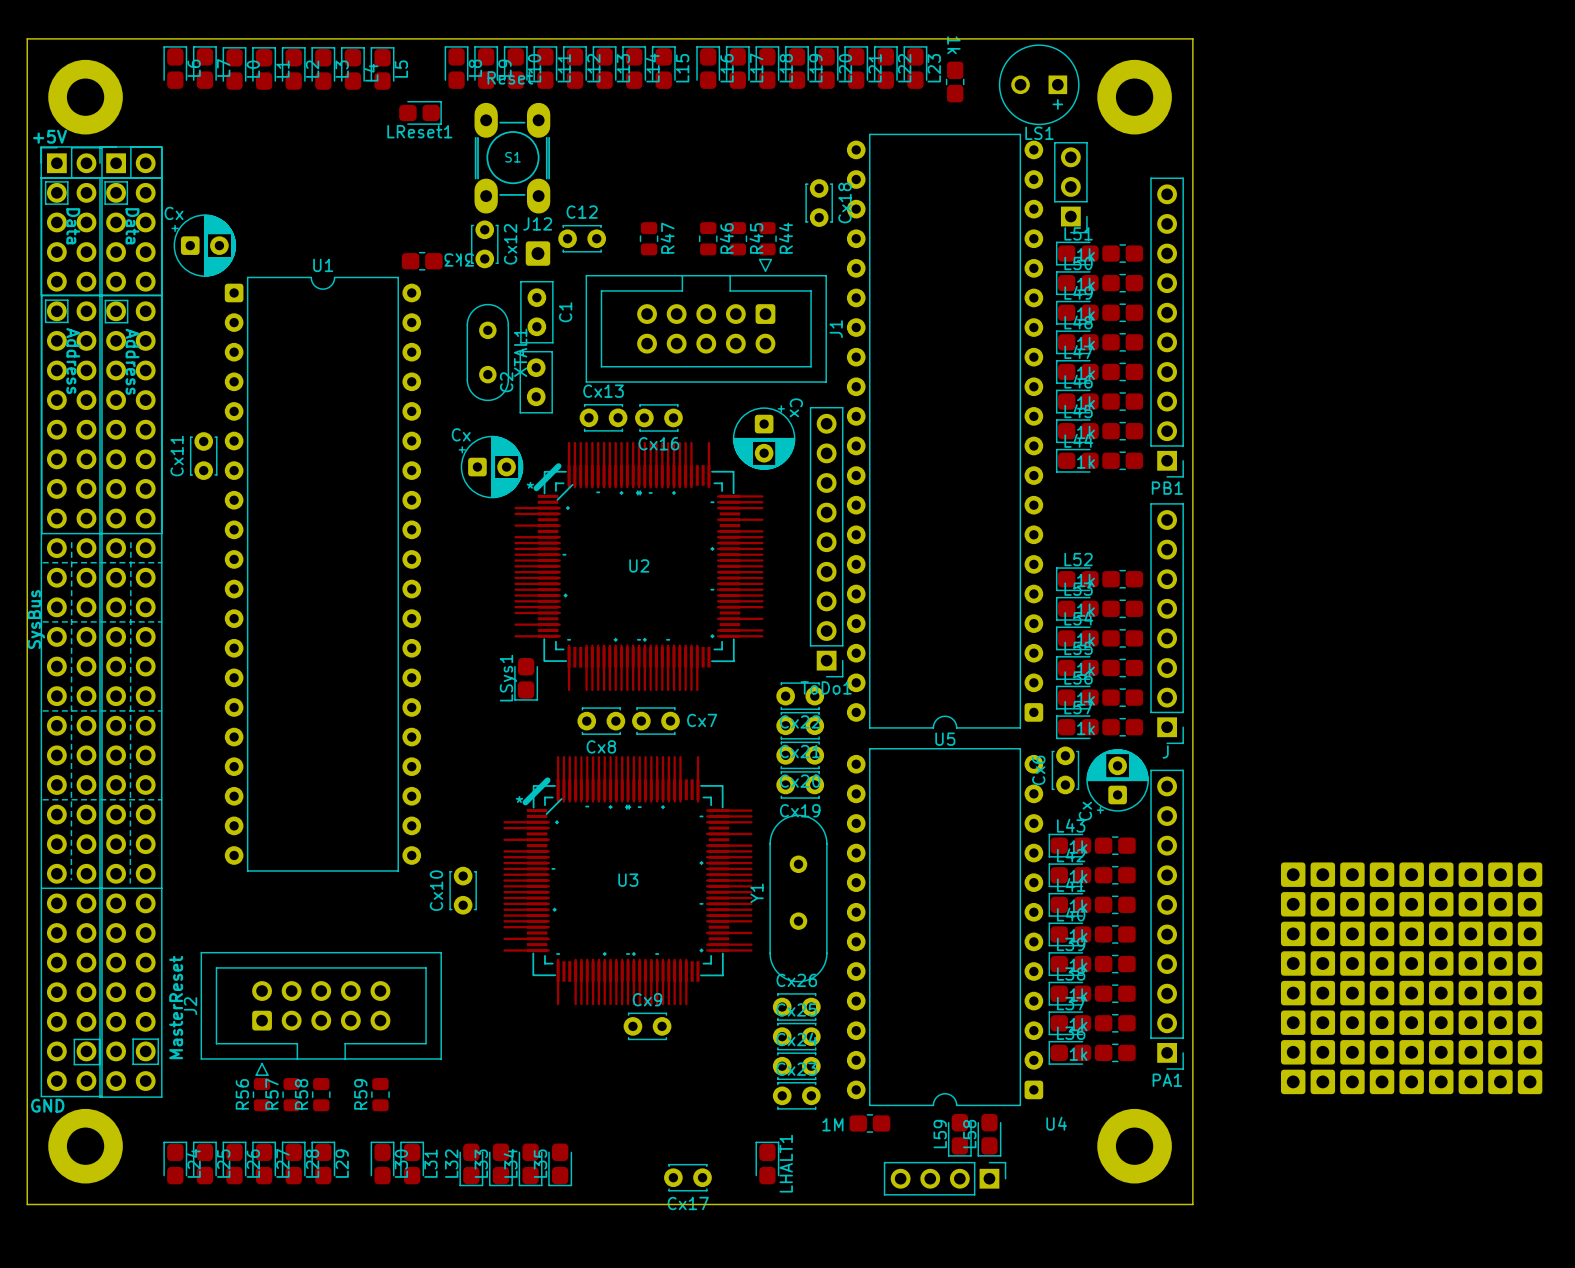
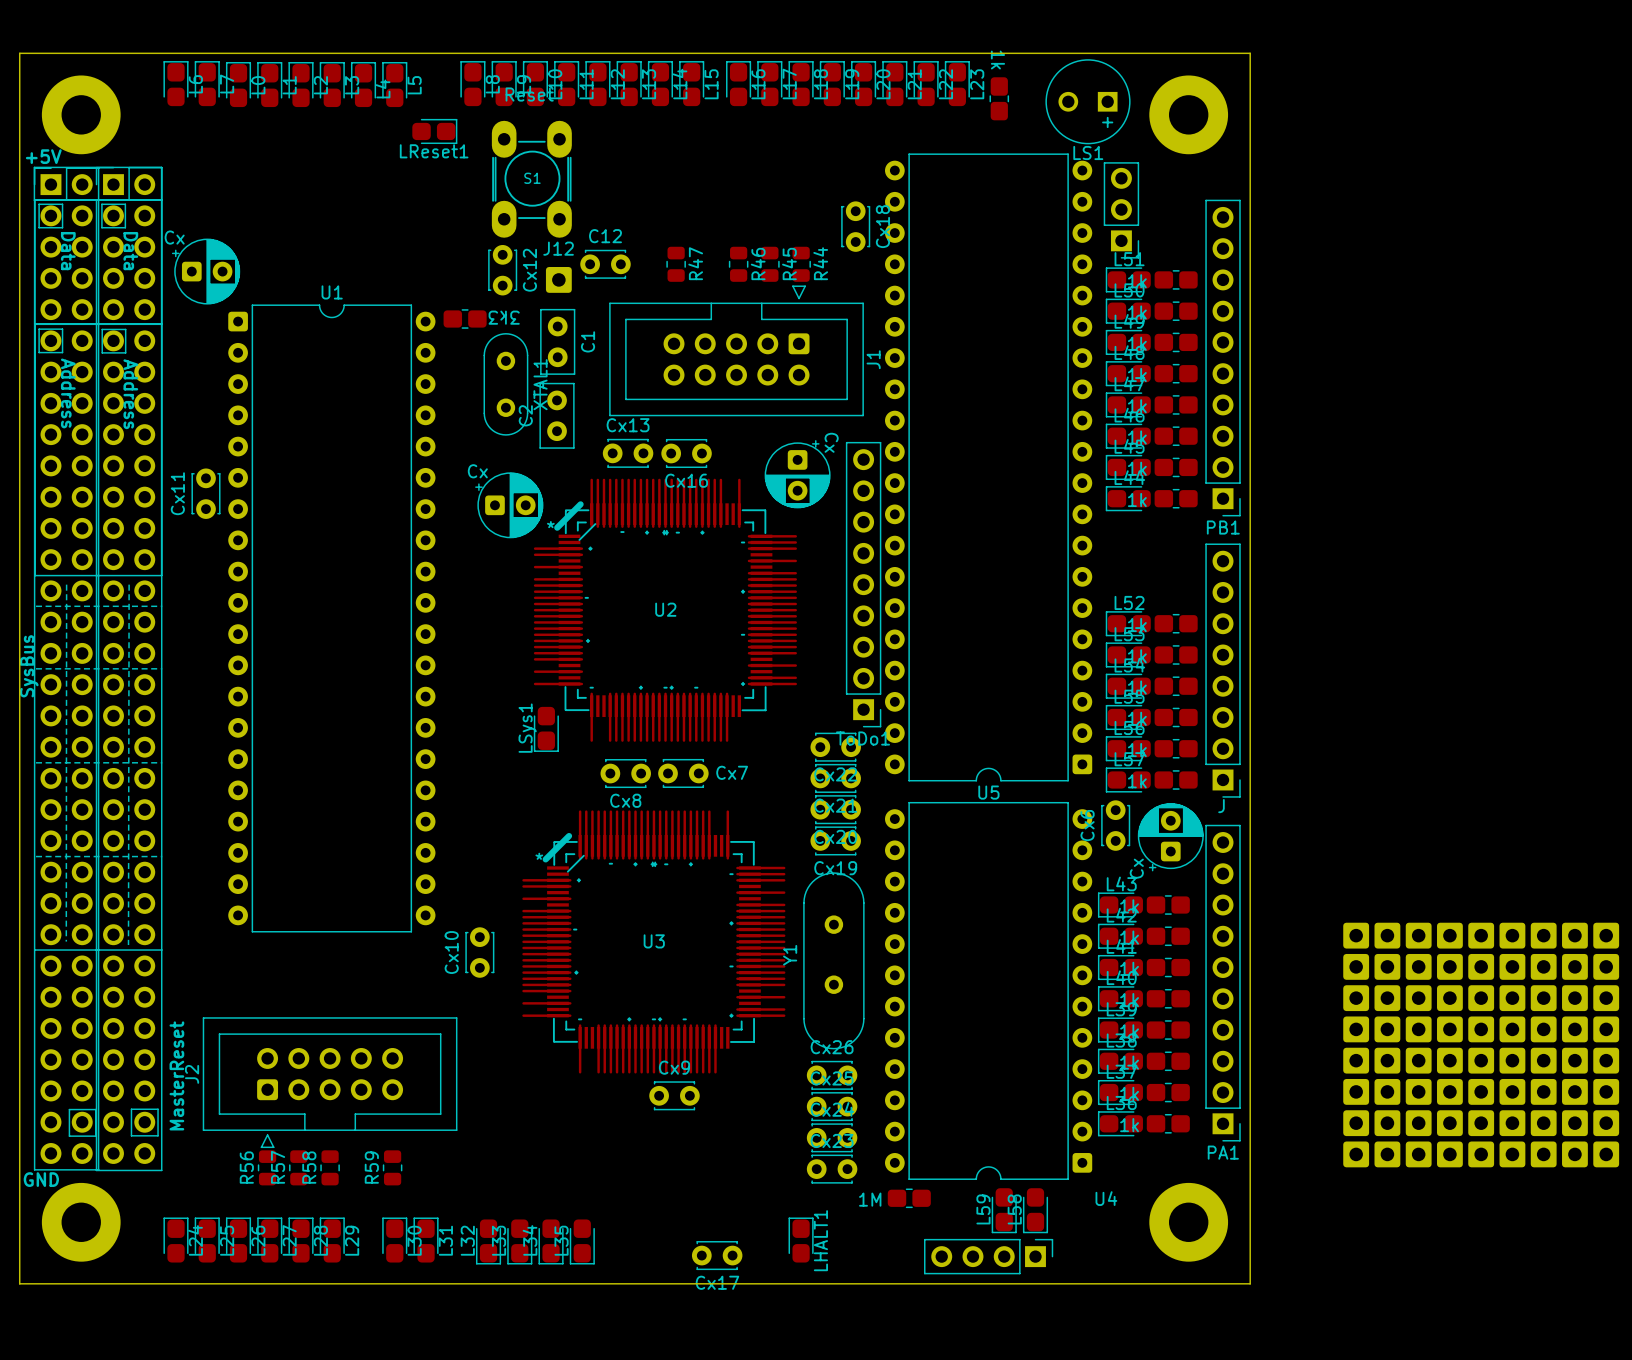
part position: (422, 261) -> (465, 318)

